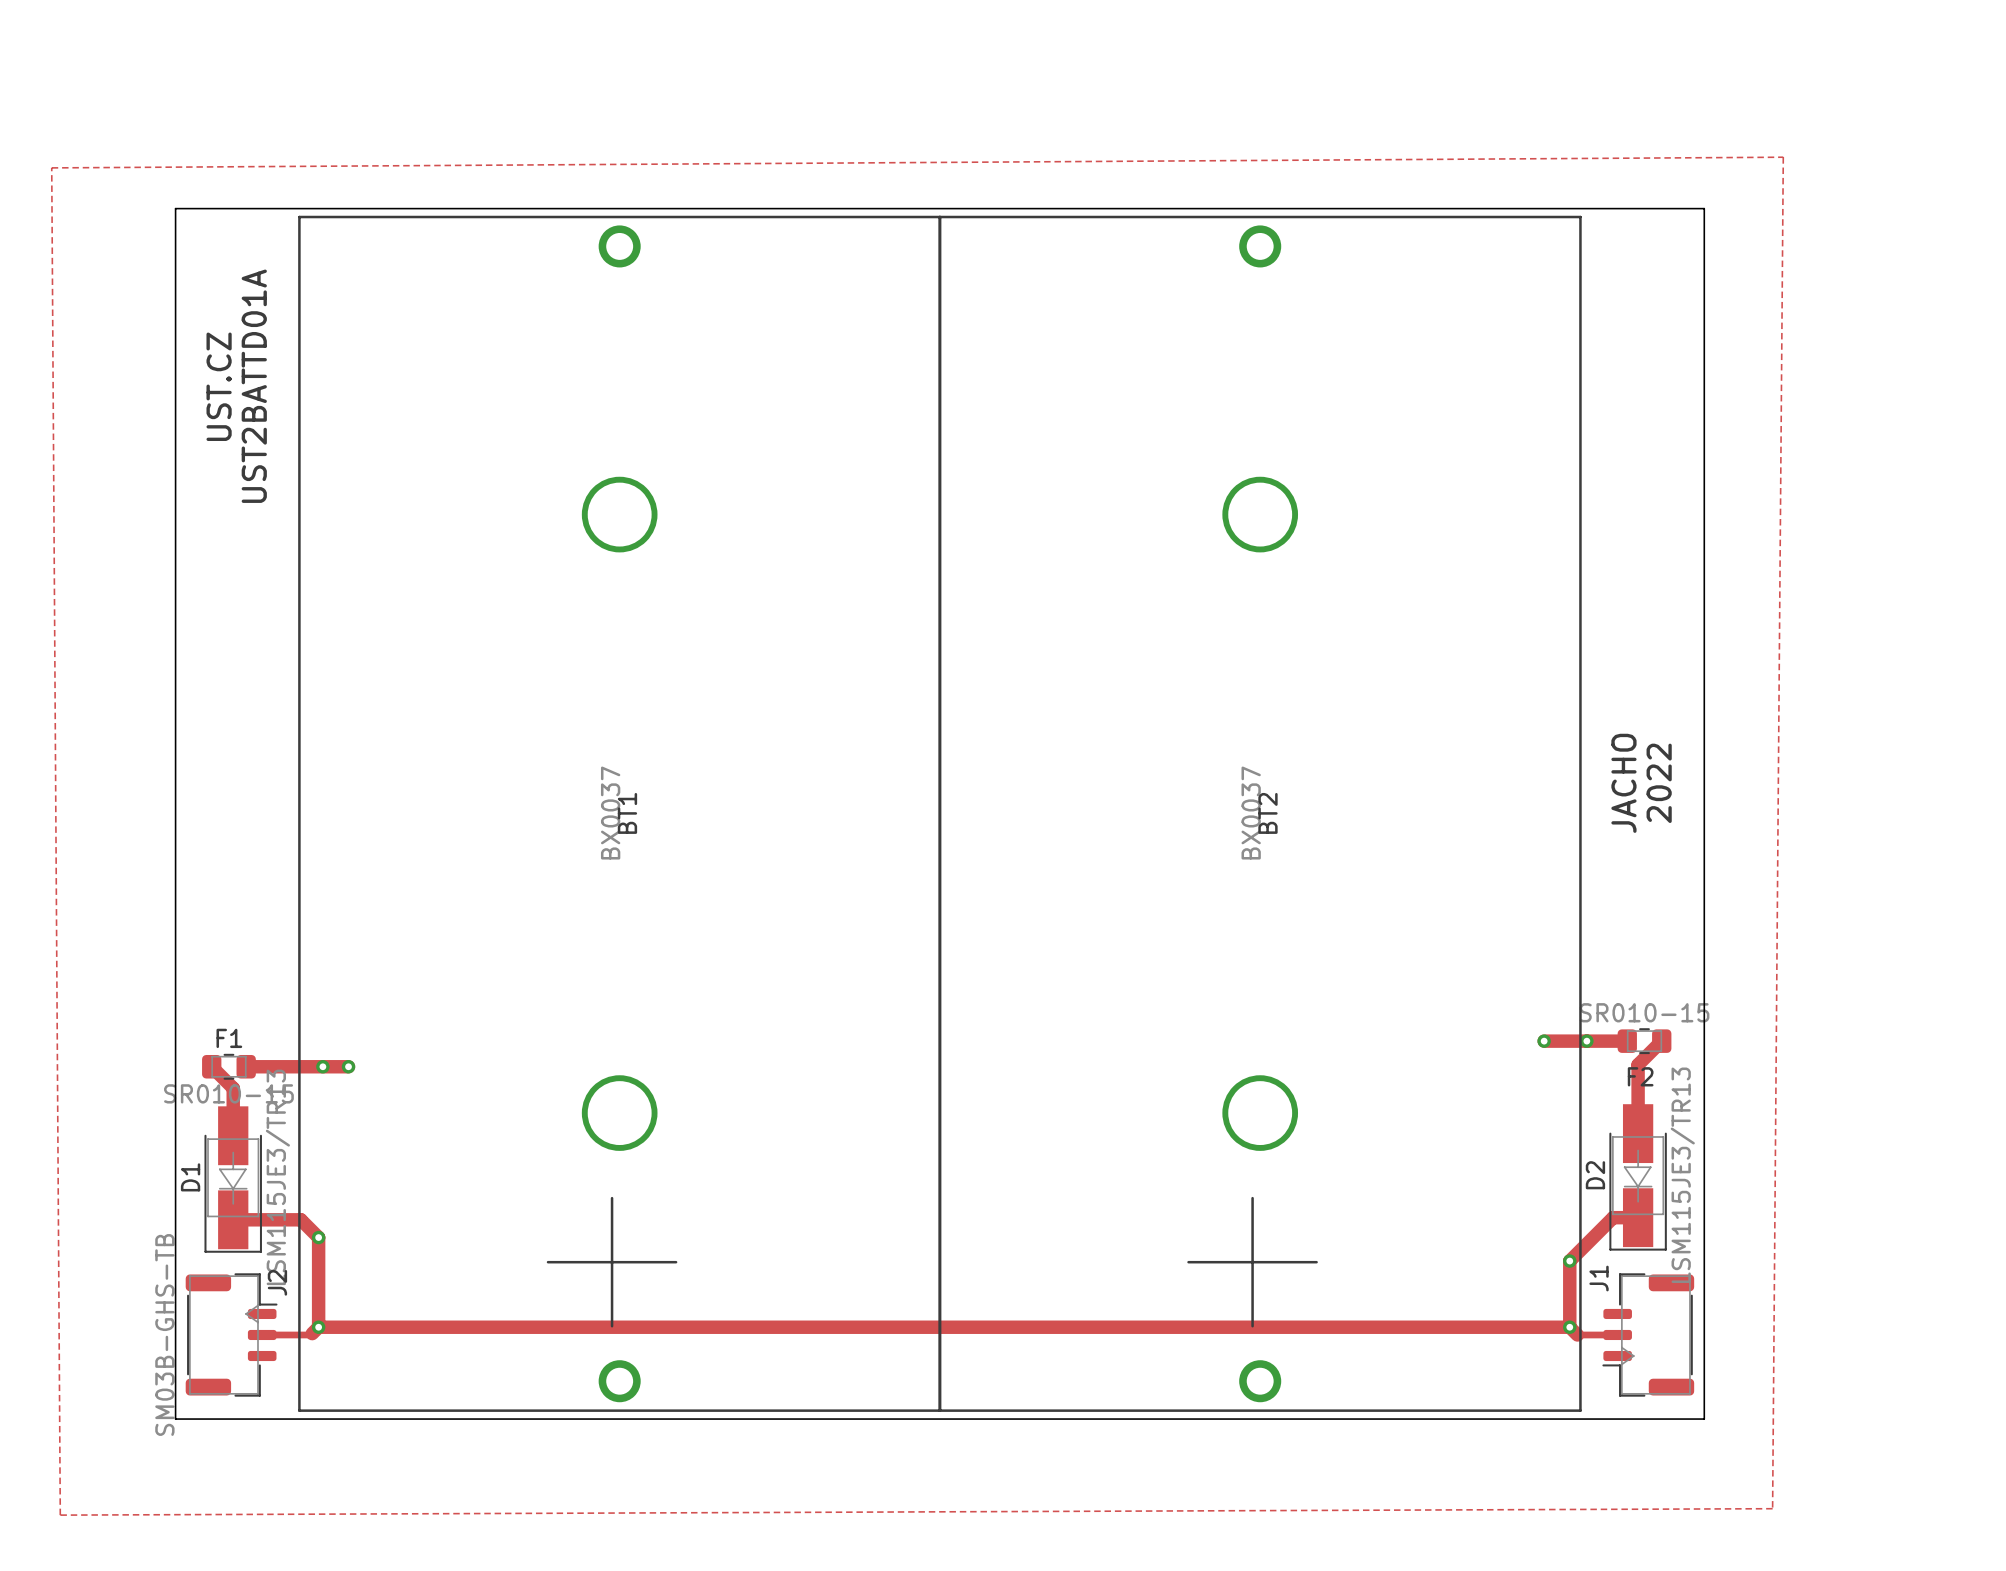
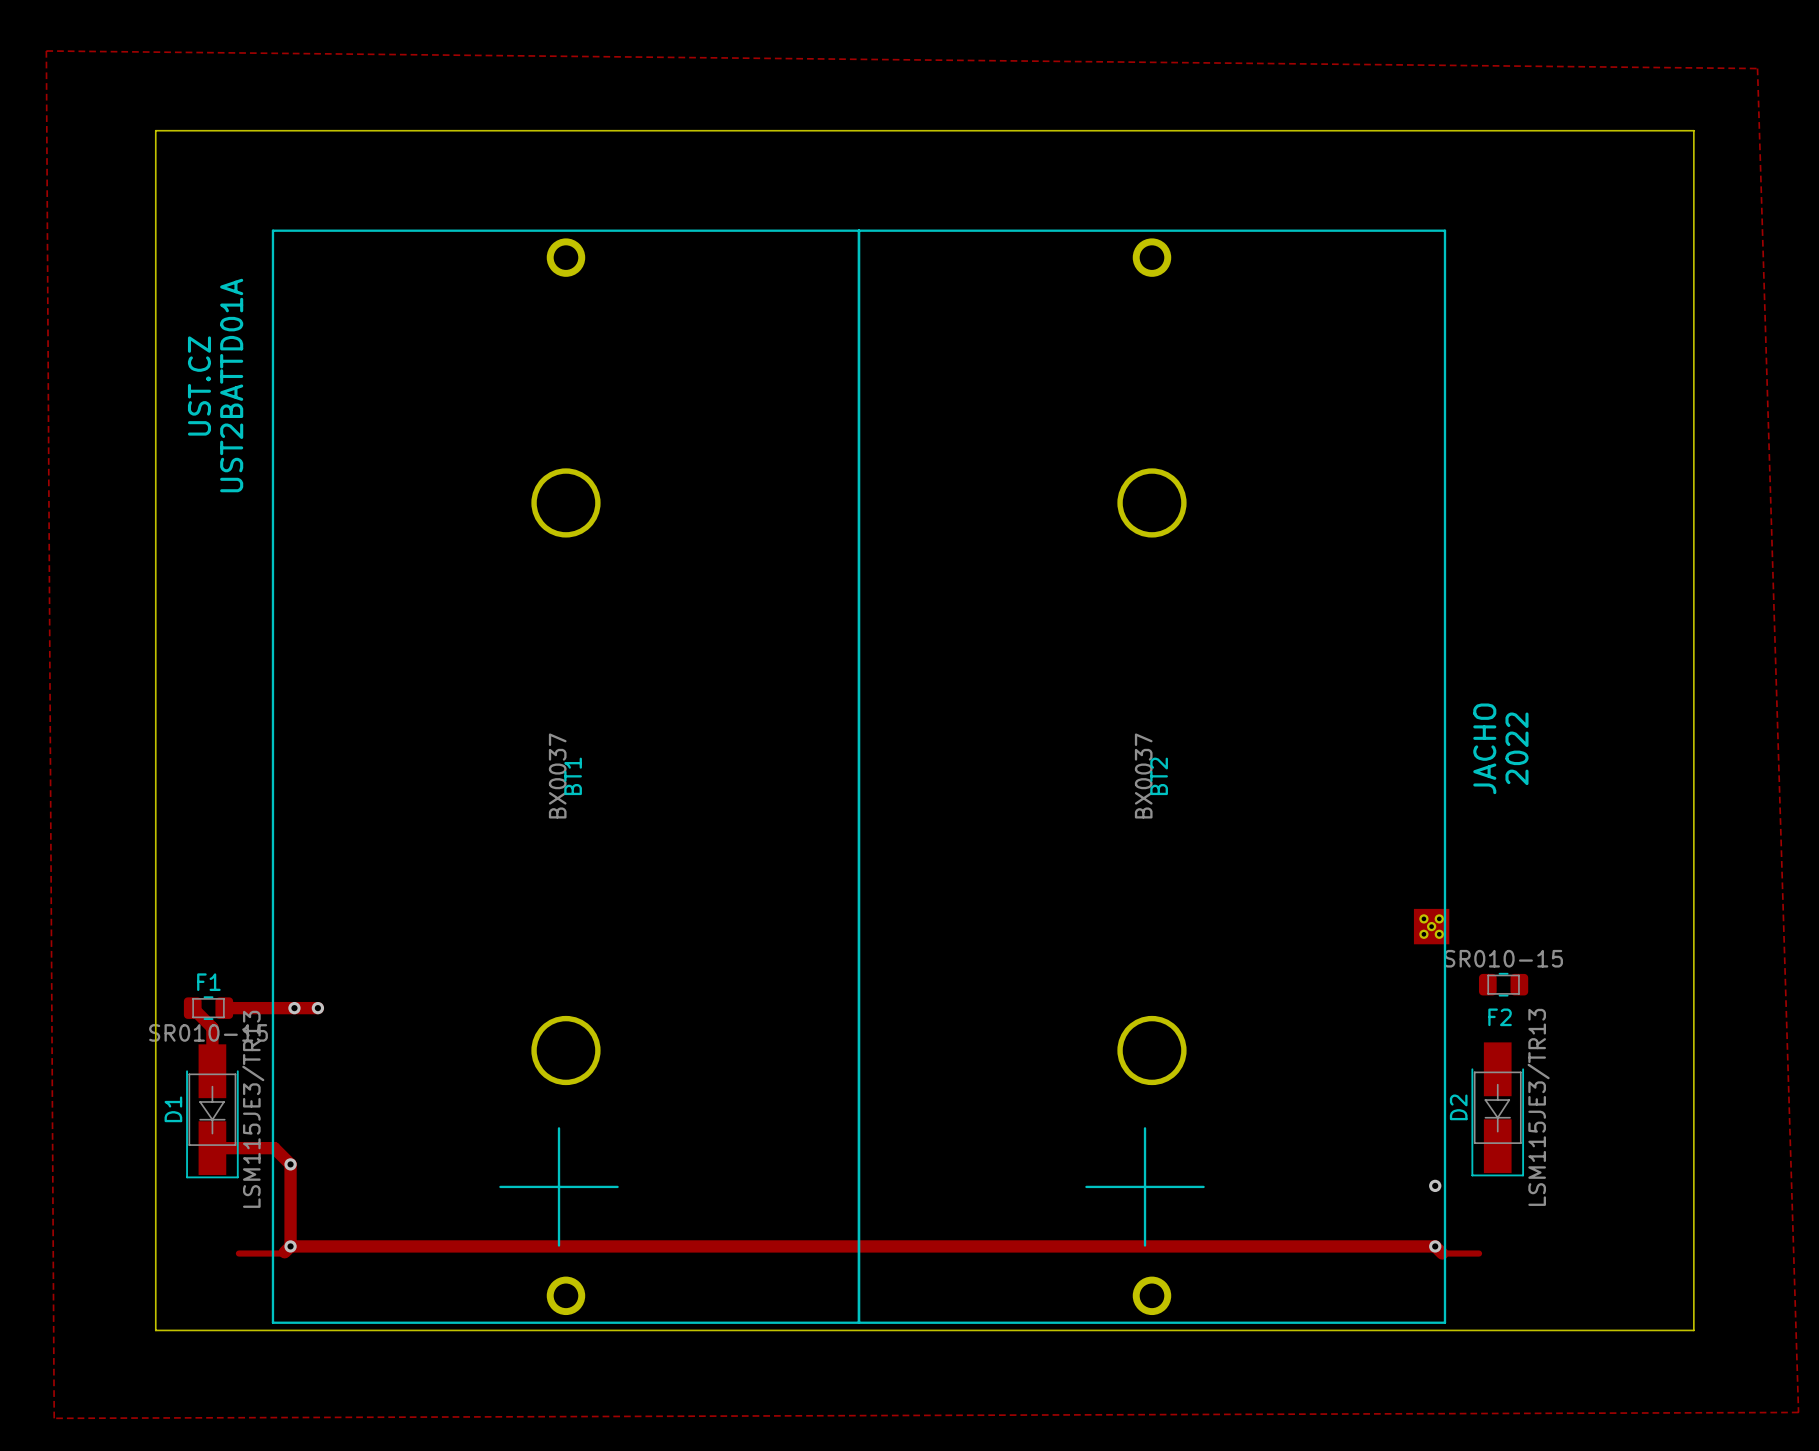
zone outline: (1783, 157) (51, 167) (60, 1515) (1772, 1508) (1783, 157) -> (46, 50) (54, 1418) (1798, 1412) (1757, 68) (46, 50)
part: none -> (1431, 926)
track: (1544, 1041) (1627, 1041) -> none
via: (1544, 1041) -> none
via: (1586, 1041) -> none
track: (1661, 1041) (1638, 1064) (1638, 1133) -> none
track: (1638, 1217) (1613, 1217) (1569, 1261) (1569, 1327) -> none
J2: SM03B-GHS-TB (231, 1334) -> none
J1: (1648, 1334) -> none
board edge: (175, 1419) (175, 208) (1704, 208) (1704, 1419) -> (159, 1330) (155, 1330) (155, 130) (1693, 130) (1693, 1330) (1558, 1330)

